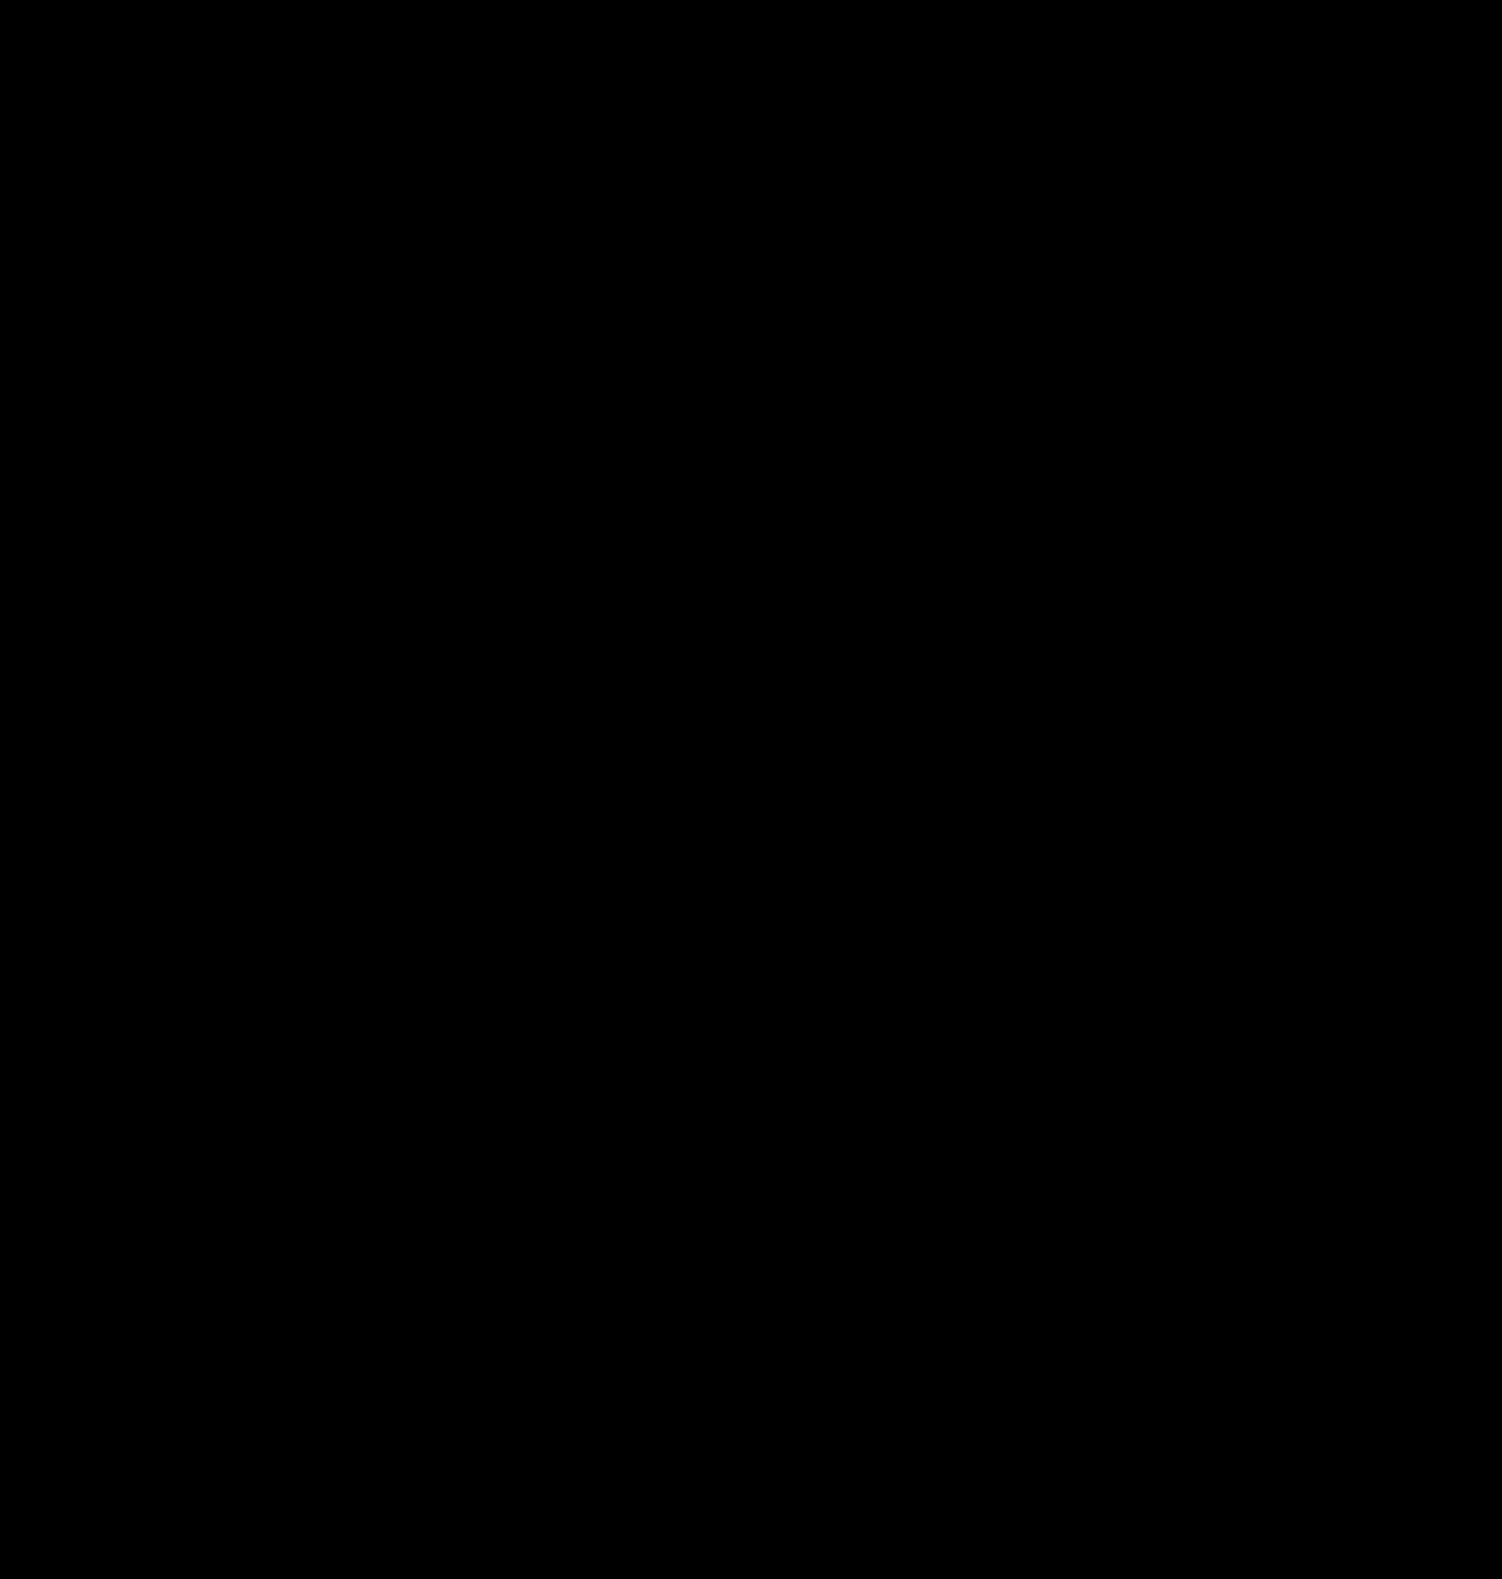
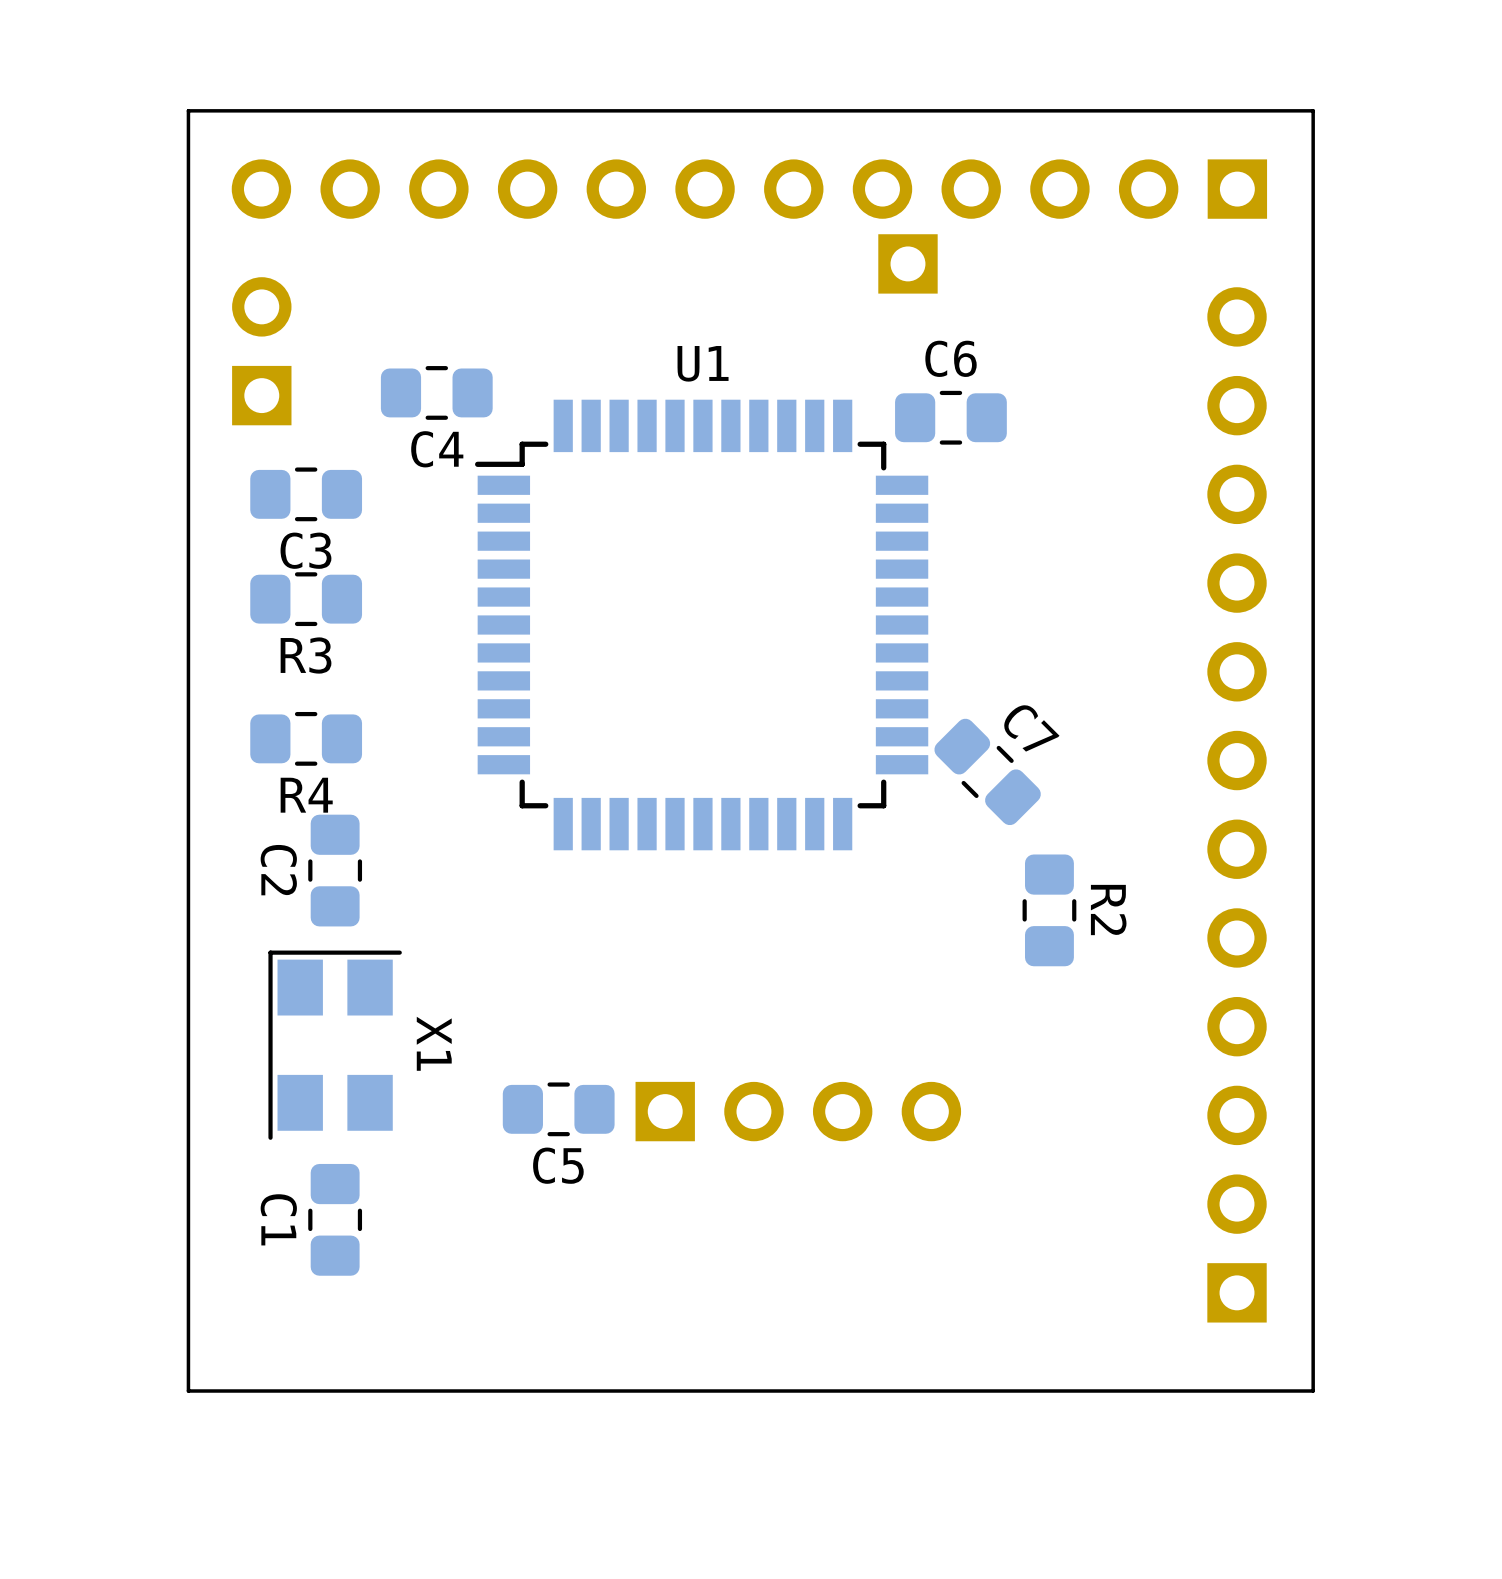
board edge: none -> (1313, 110) (188, 110) (188, 1391) (1313, 1391) (1313, 110)
part: none -> (749, 189)
part: none -> (907, 263)
part: none -> (261, 351)
C4: none -> (436, 392)
C6: none -> (950, 417)
C3: none -> (306, 494)
R3: none -> (306, 599)
U1: none -> (701, 625)
R4: none -> (306, 738)
C7: none -> (987, 771)
part: none -> (1237, 804)
C2: none -> (335, 870)
R2: none -> (1049, 910)
X1: none -> (335, 1045)
C5: none -> (558, 1109)
part: none -> (798, 1111)
C1: none -> (335, 1219)

